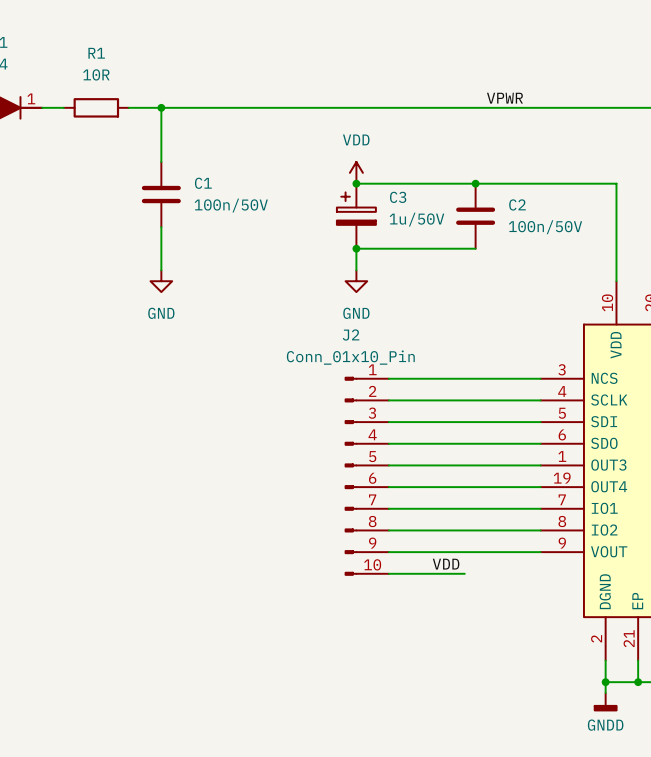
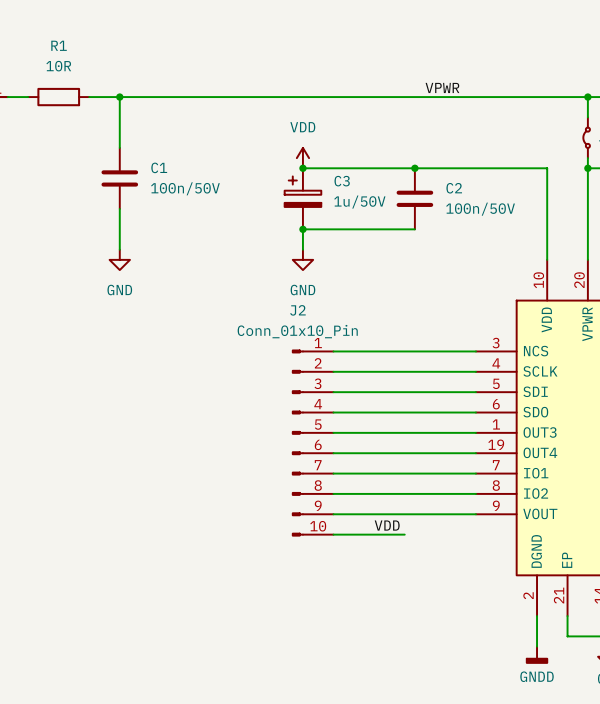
wire: (605, 682) (638, 682) -> none
junction: (605, 682) -> none
junction: (638, 682) -> none

